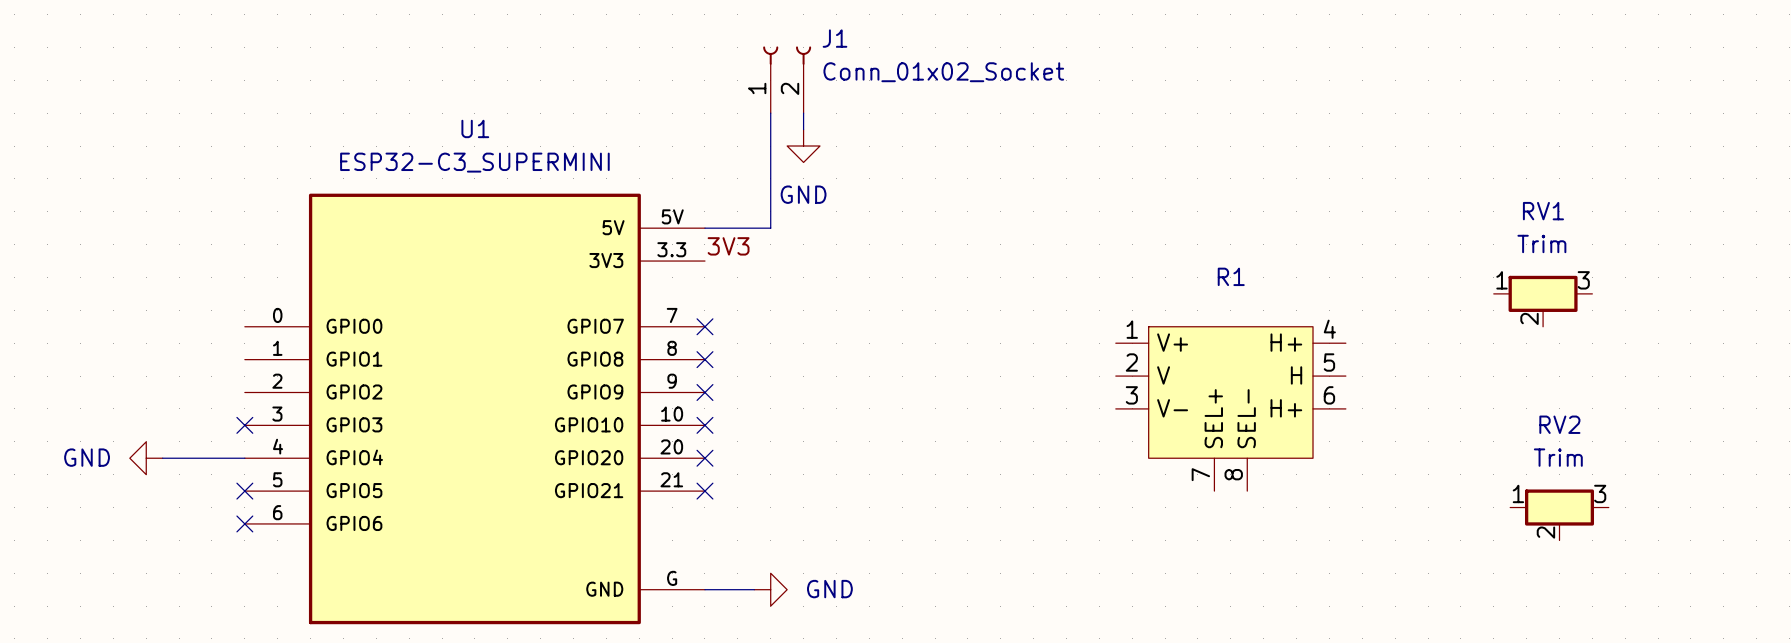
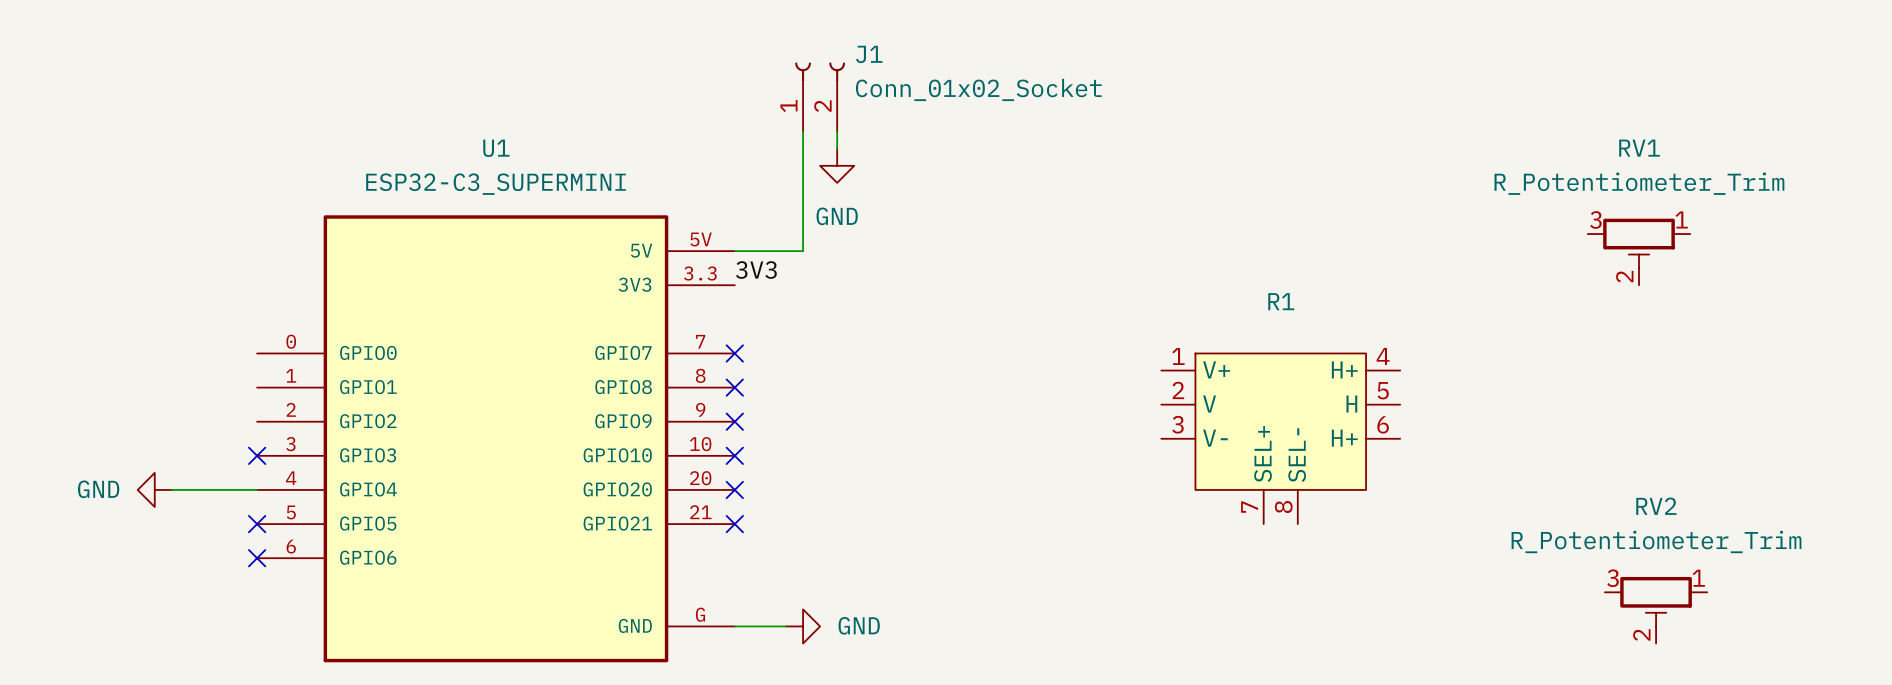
RV1 value: Trim (1541, 243) -> R_Potentiometer_Trim (1639, 183)
RV1 symbol: [1493, 275, 1593, 327] -> [1587, 218, 1691, 286]
RV2 value: Trim (1558, 457) -> R_Potentiometer_Trim (1656, 541)
RV2 symbol: [1510, 489, 1609, 541] -> [1604, 576, 1708, 644]

